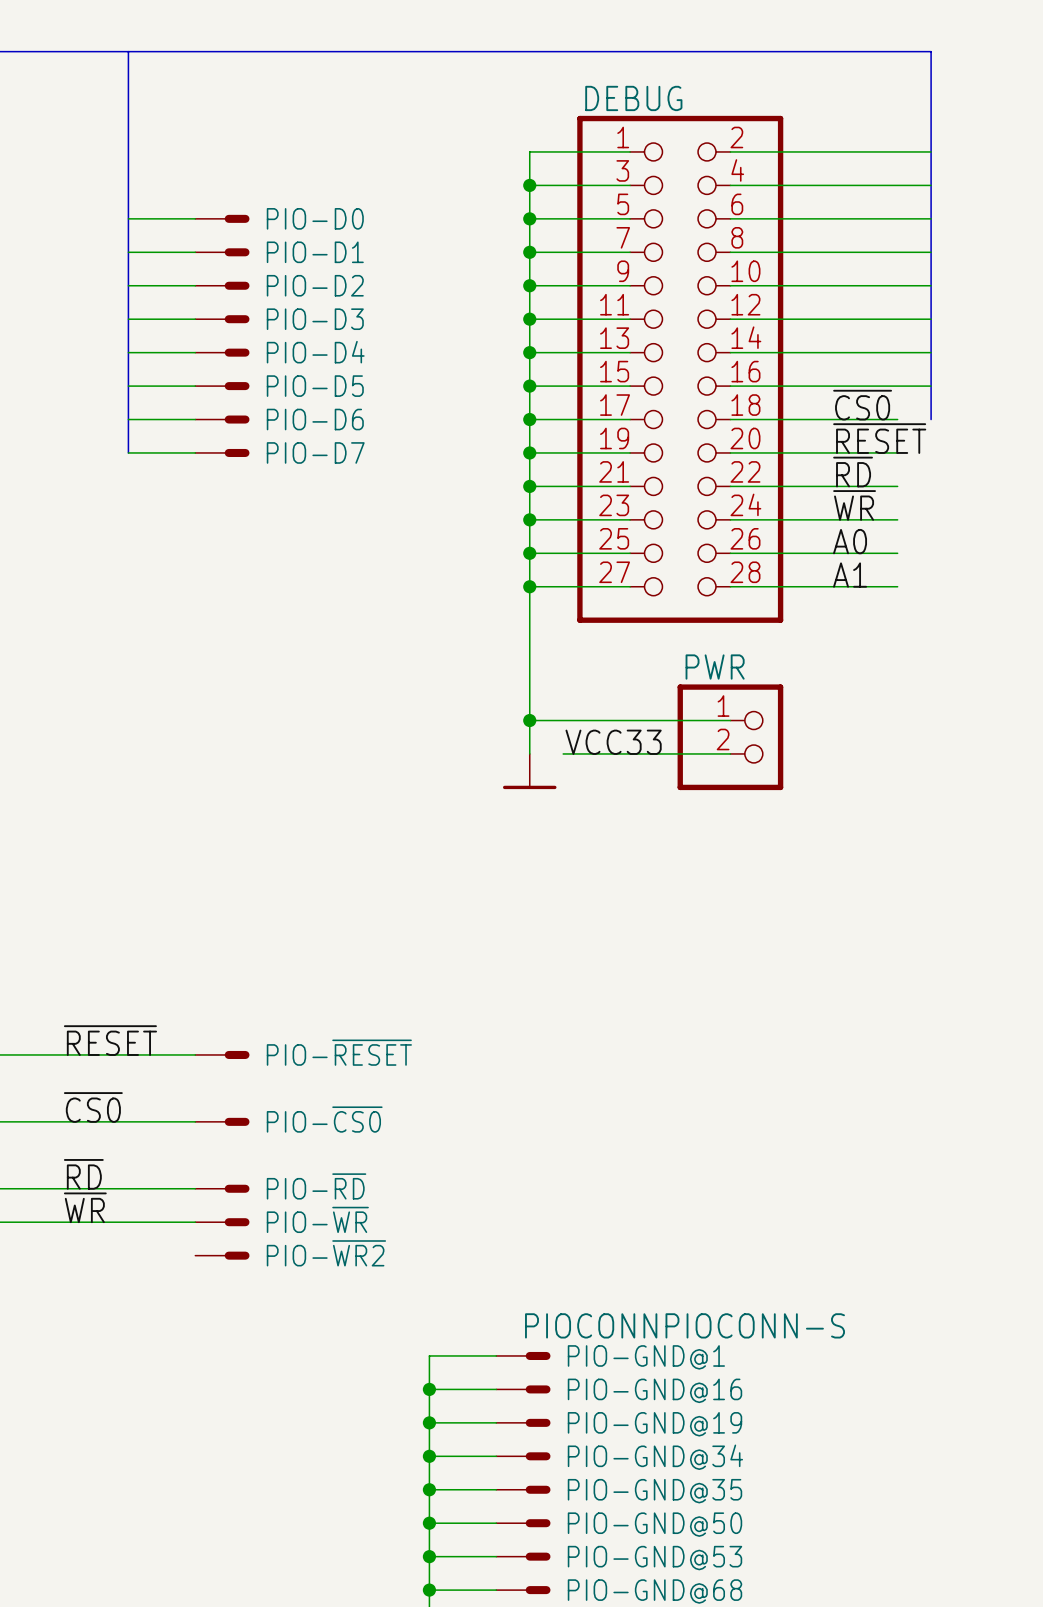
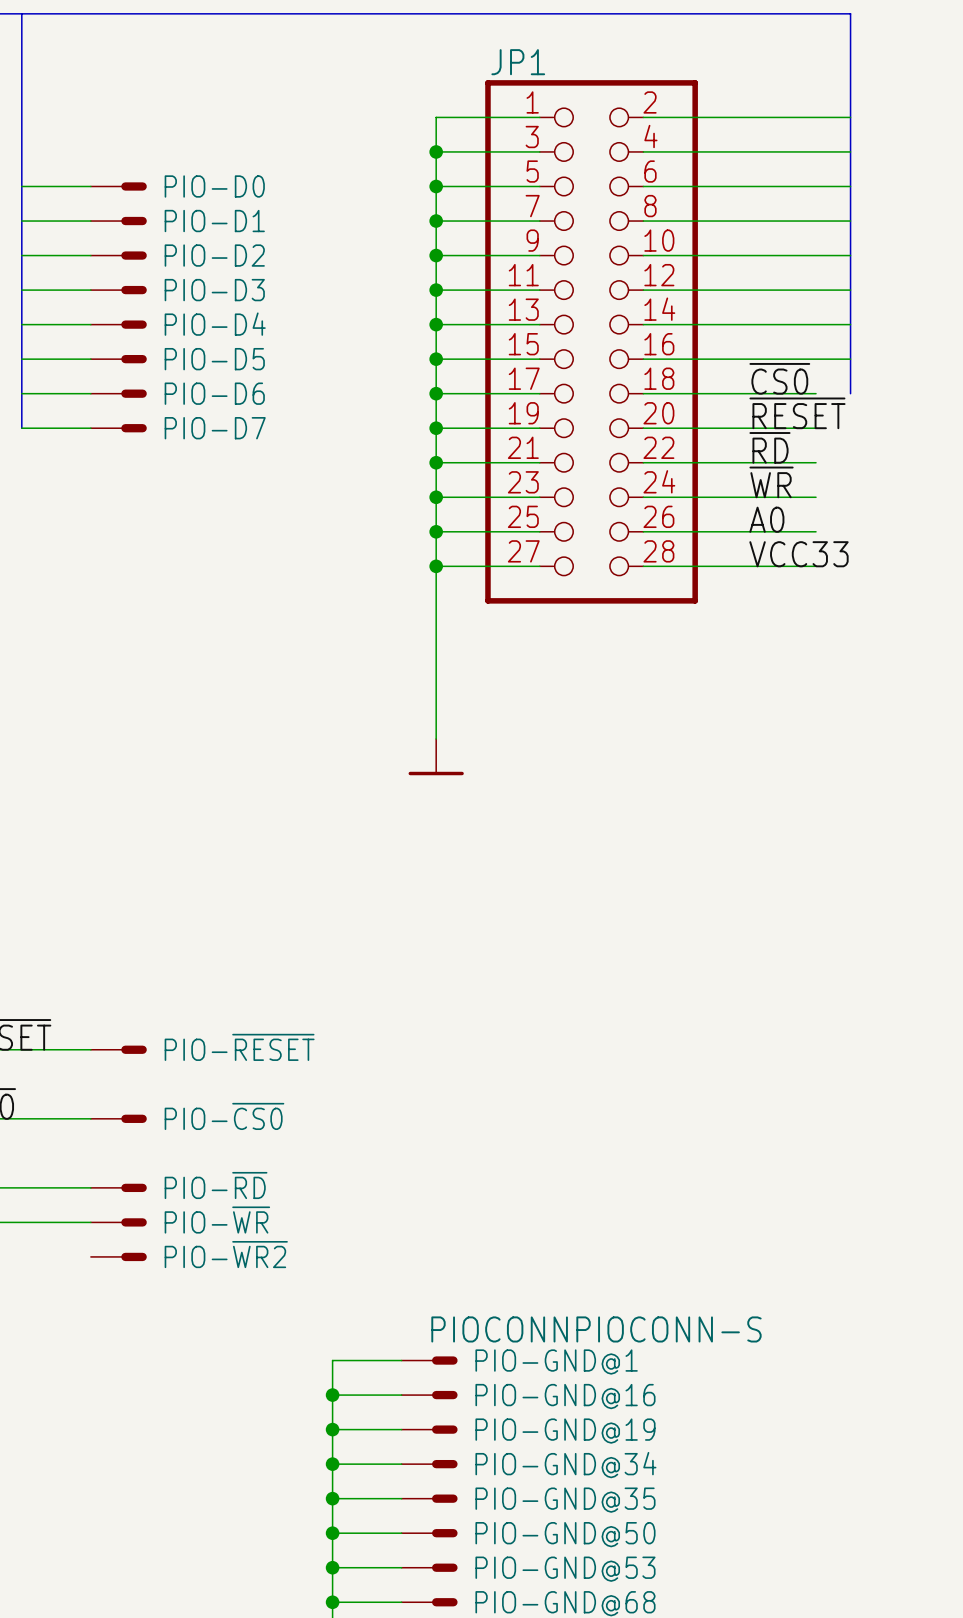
DEBUG name: DEBUG (633, 98) -> JP1 (518, 62)
label: A1 (850, 575) -> VCC33 (798, 554)
wire: (529, 720) (730, 720) -> none
junction: (529, 720) -> none
PWR: (730, 737) -> none
label: VCC33 (613, 742) -> none
wire: (563, 753) (730, 753) -> none

